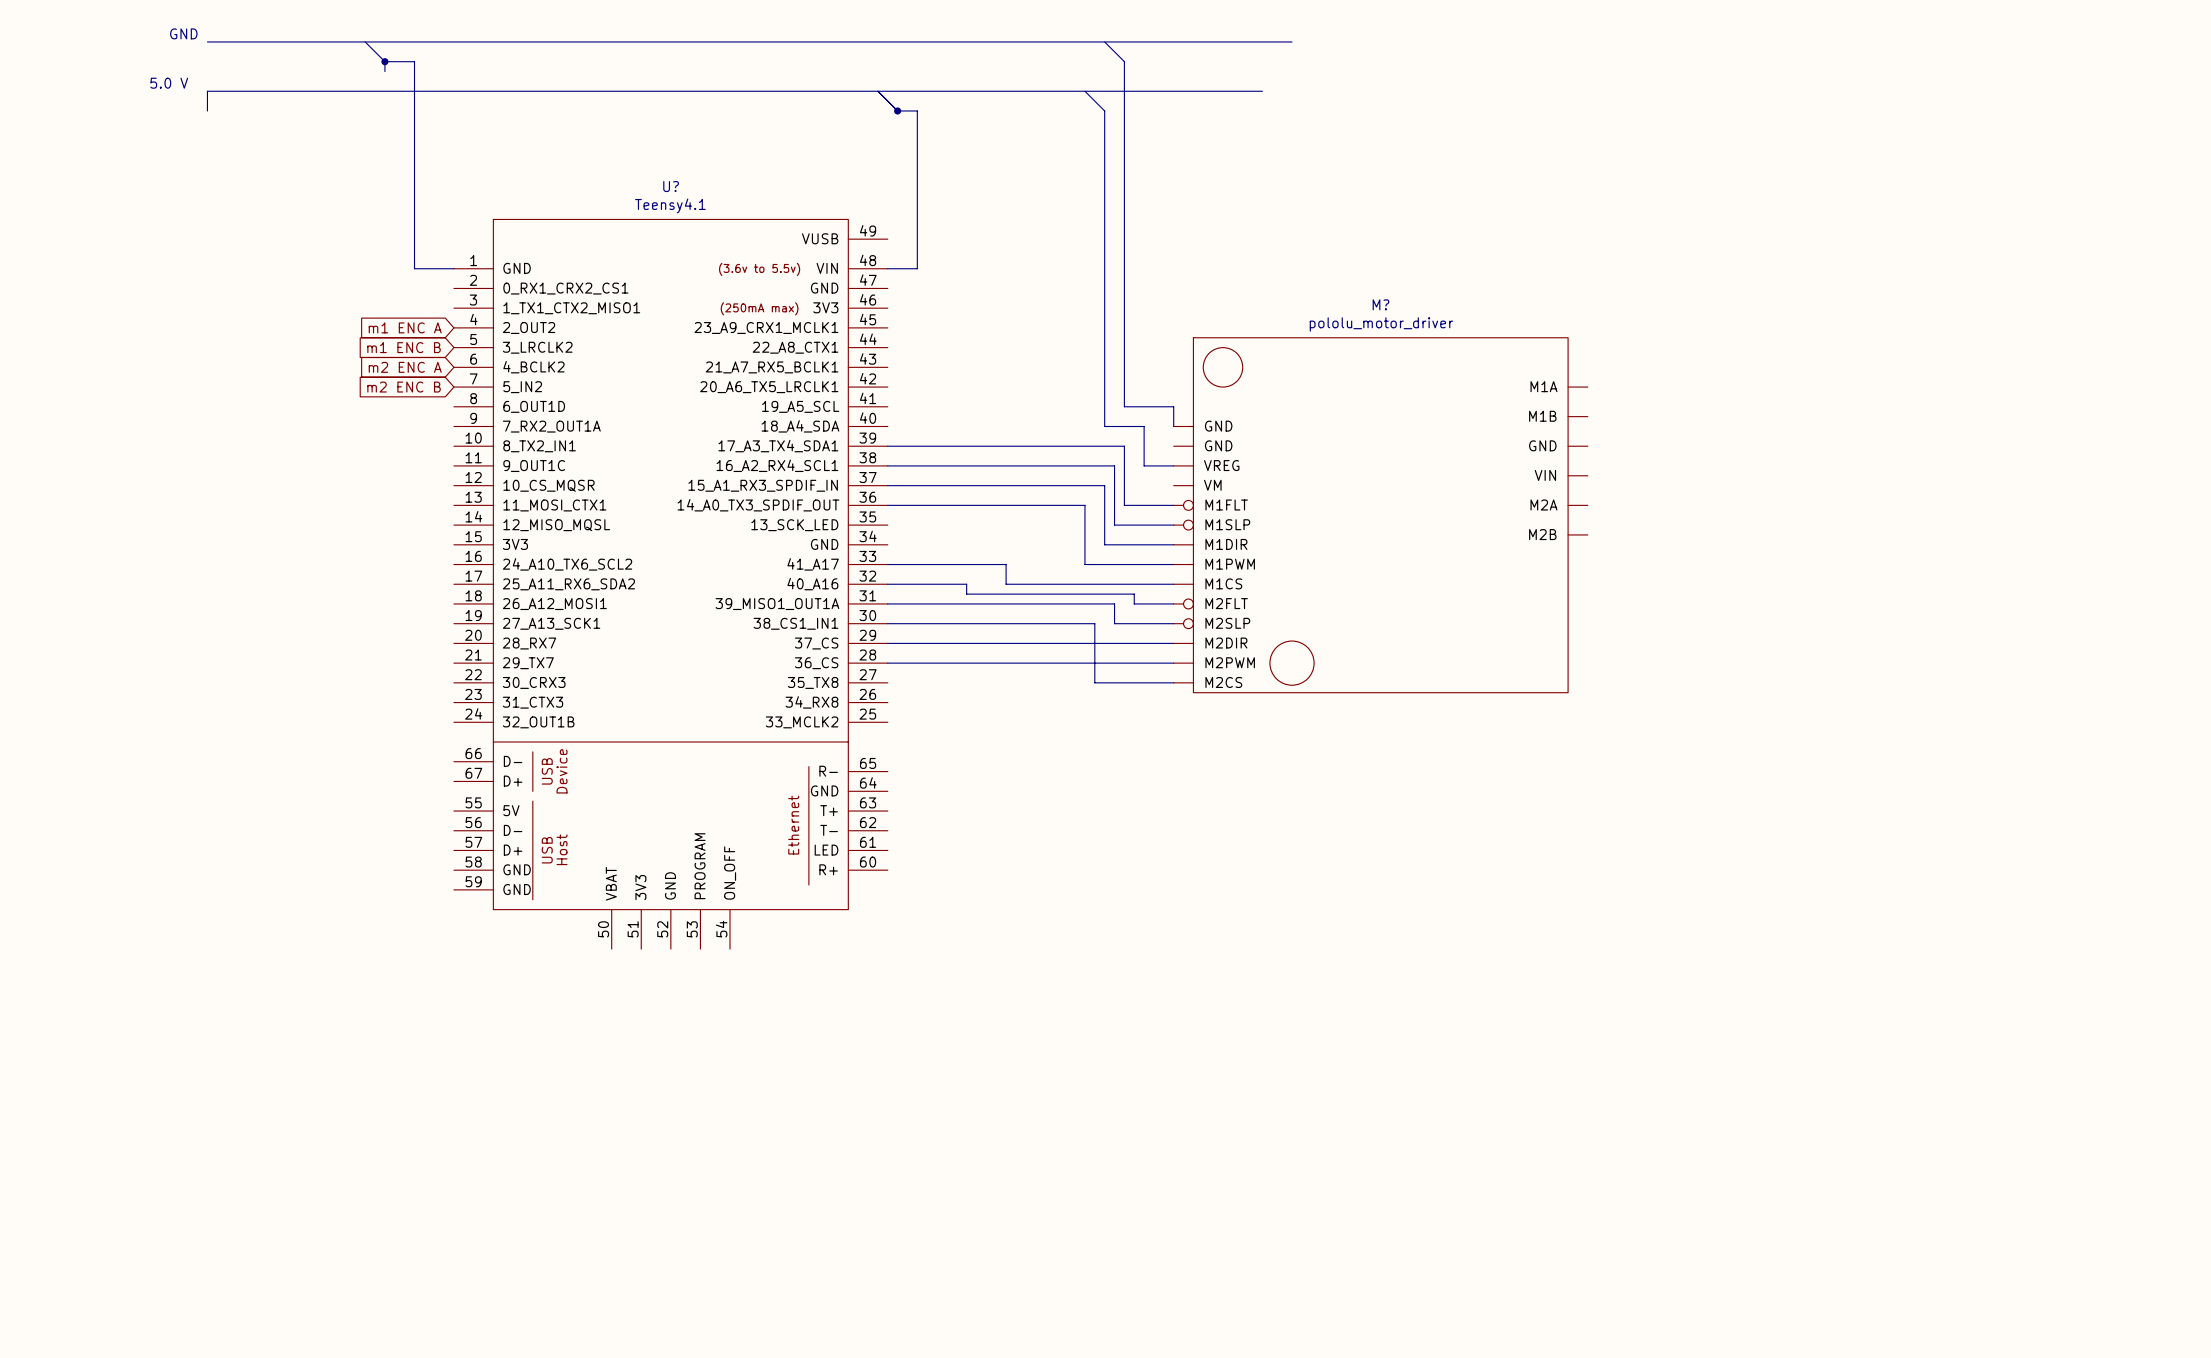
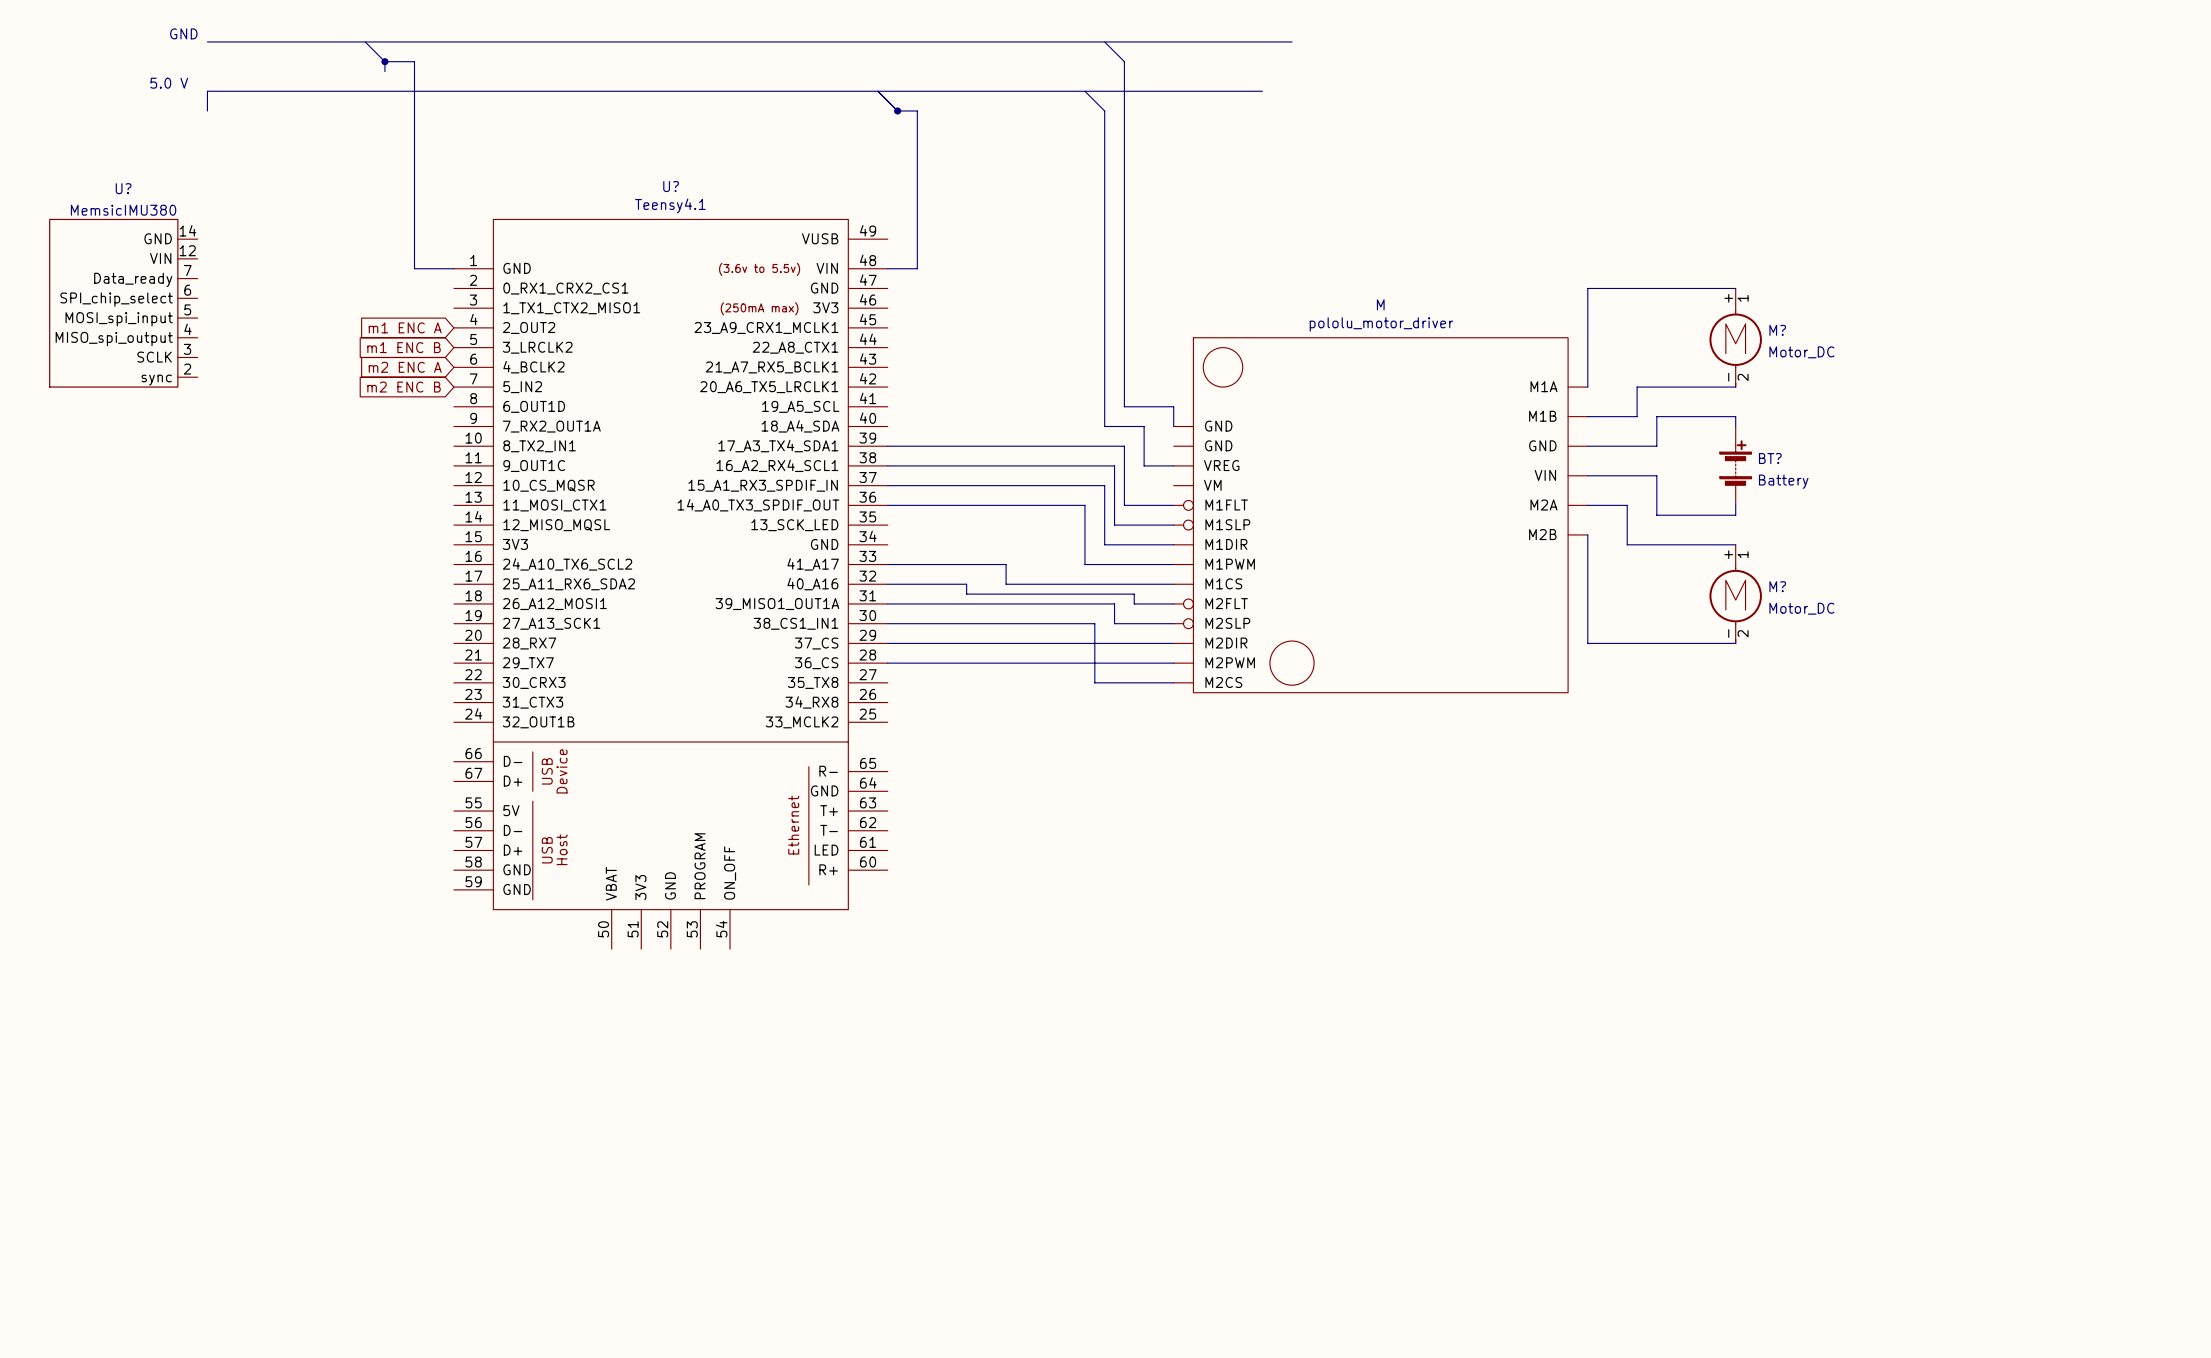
wire: none -> (1735, 288) (1587, 288) (1587, 387)
U?: none -> MemsicIMU380 (123, 303)
M? name: M? (1380, 304) -> M (1380, 304)
M?: none -> Motor_DC (1735, 337)
wire: none -> (1735, 387) (1637, 387) (1637, 416) (1587, 416)
wire: none -> (1735, 426) (1735, 416) (1656, 416) (1656, 446) (1587, 446)
BT?: none -> Battery (1735, 465)
wire: none -> (1587, 475) (1656, 475) (1656, 515) (1735, 515) (1735, 505)
wire: none -> (1587, 505) (1627, 505) (1627, 544) (1735, 544)
wire: none -> (1587, 534) (1587, 643) (1735, 643)
M?: none -> Motor_DC (1735, 594)

